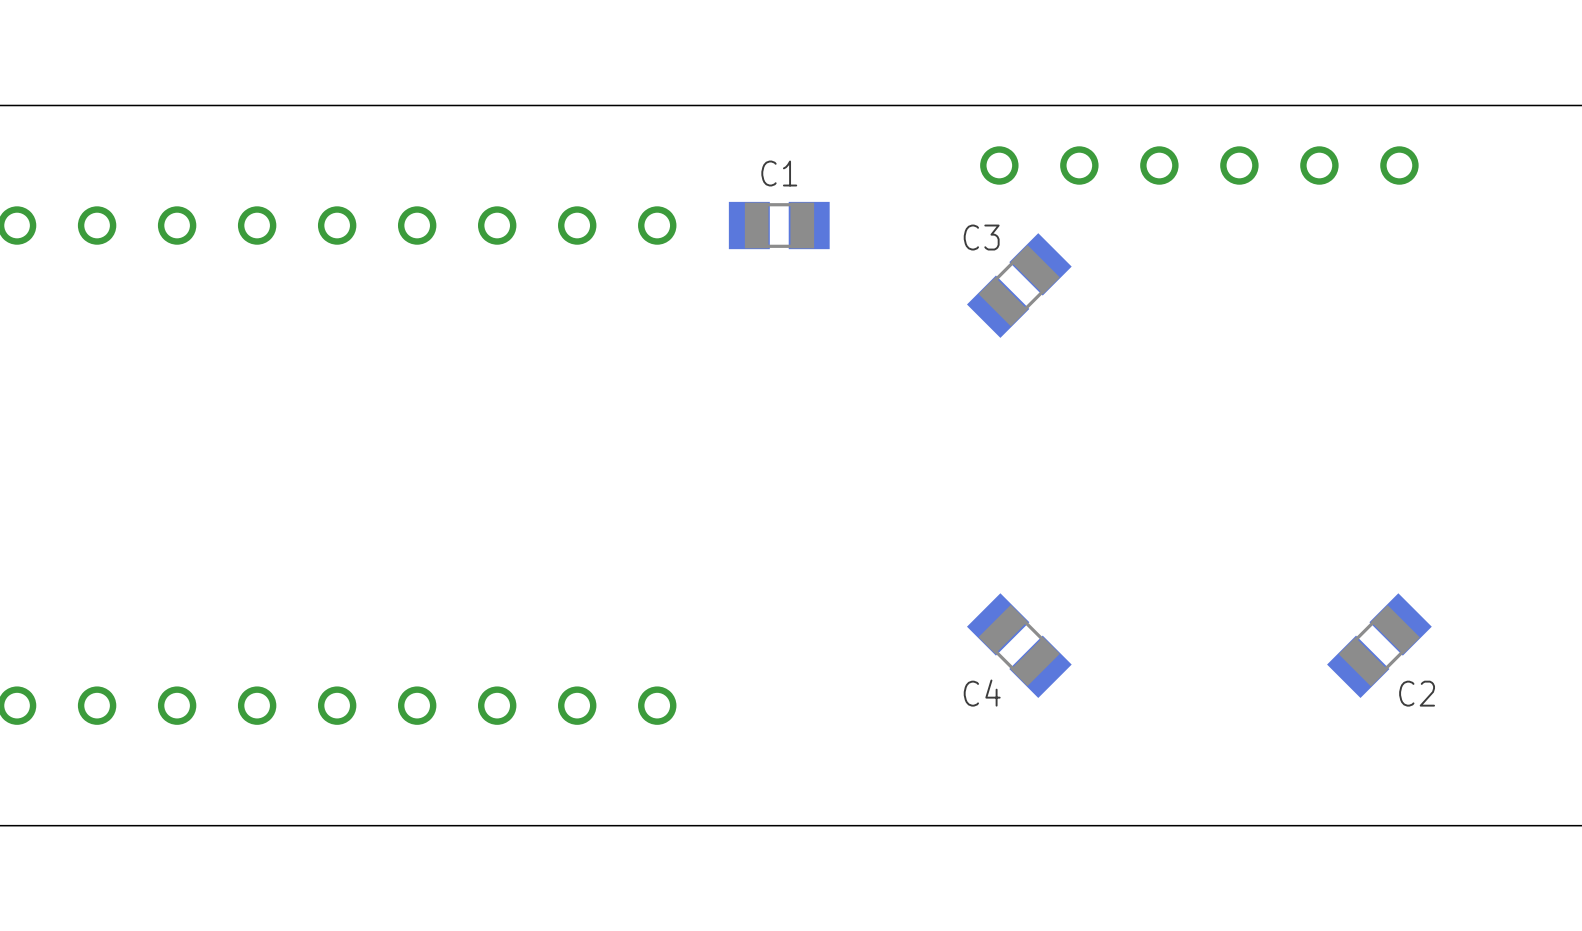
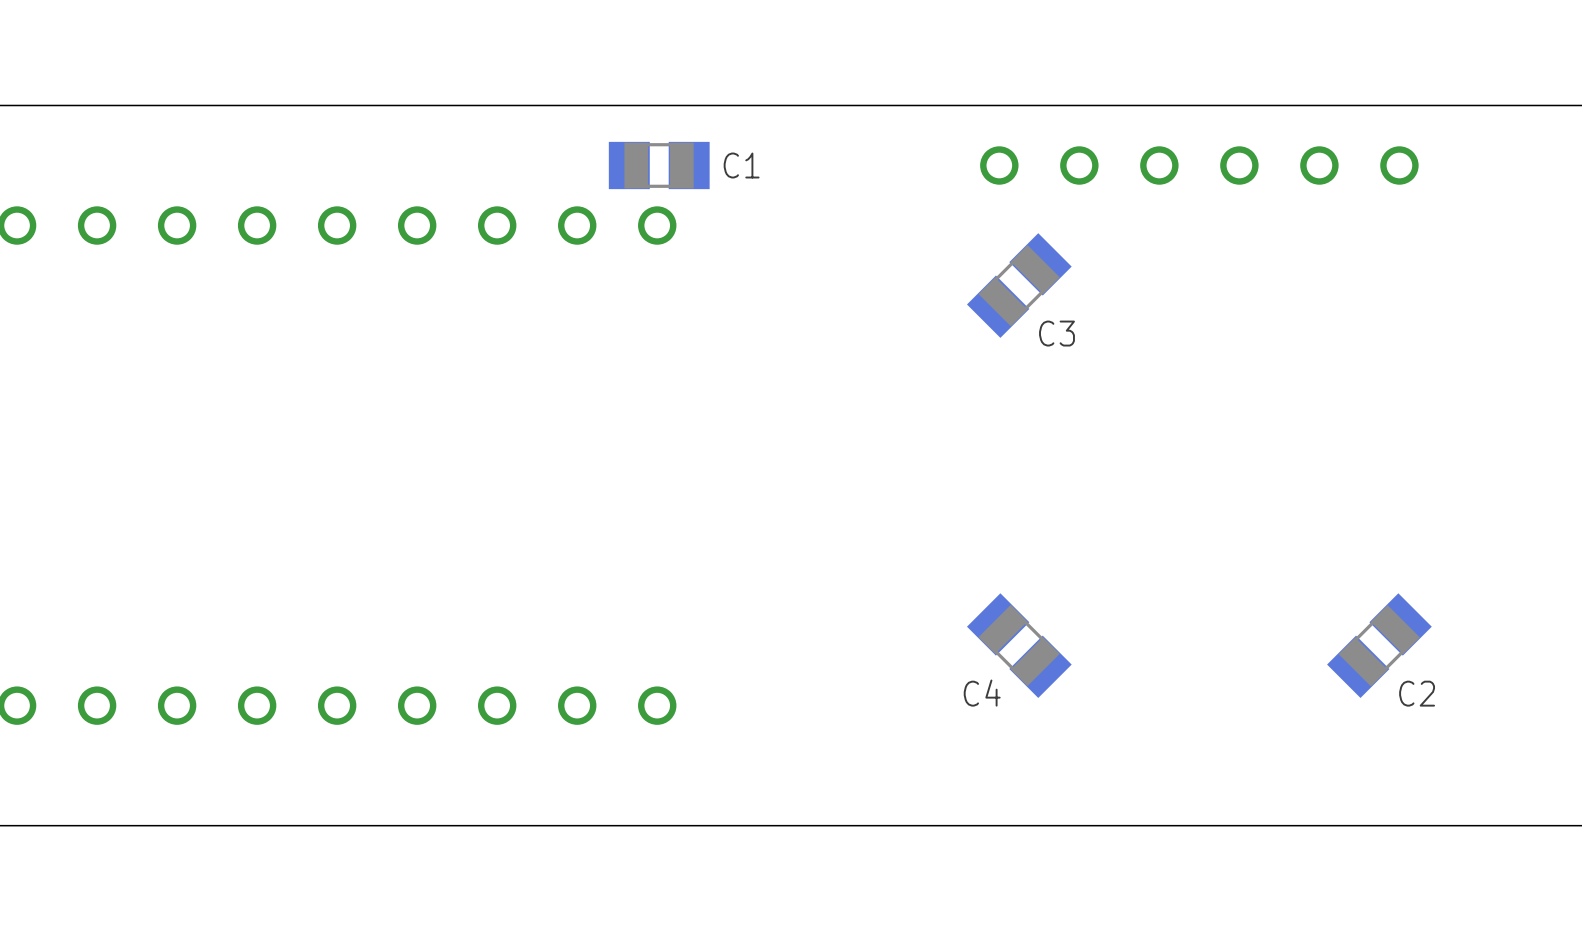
C1 name position: C1 (779, 173) -> C1 (741, 165)
C1 position: (779, 225) -> (659, 165)
C3 name position: C3 (981, 237) -> C3 (1056, 333)

